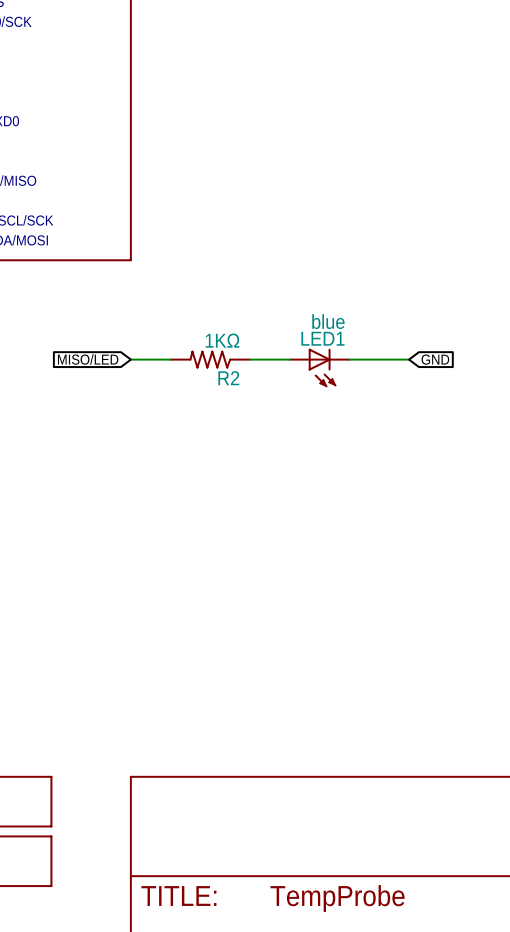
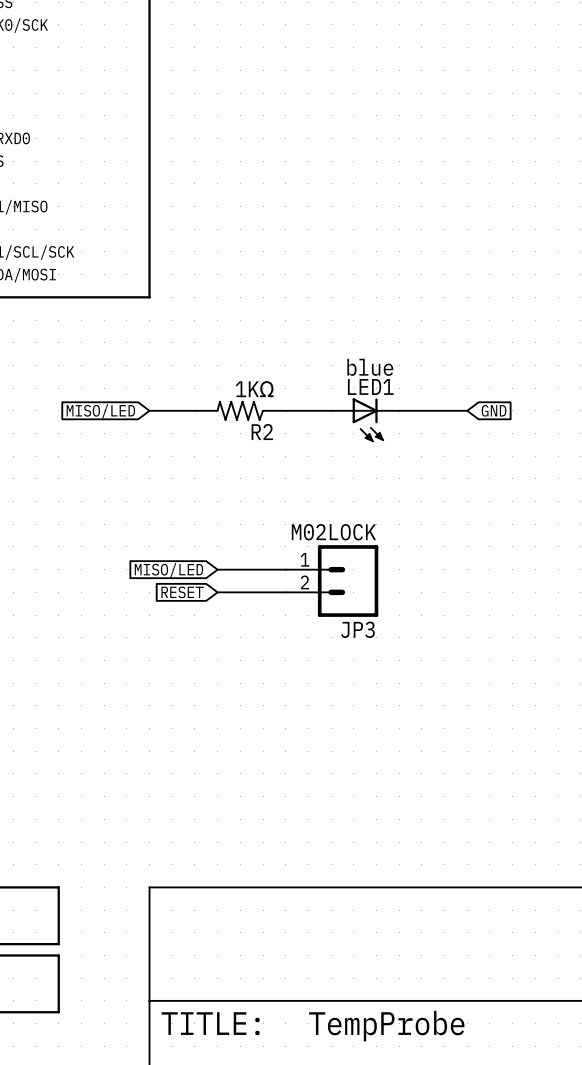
global label: none -> MISO/LED (168, 570)
wire: none -> (217, 569) (285, 569)
JP3: none -> M02LOCK (331, 581)
global label: none -> RESET (182, 592)
wire: none -> (217, 592) (285, 592)

